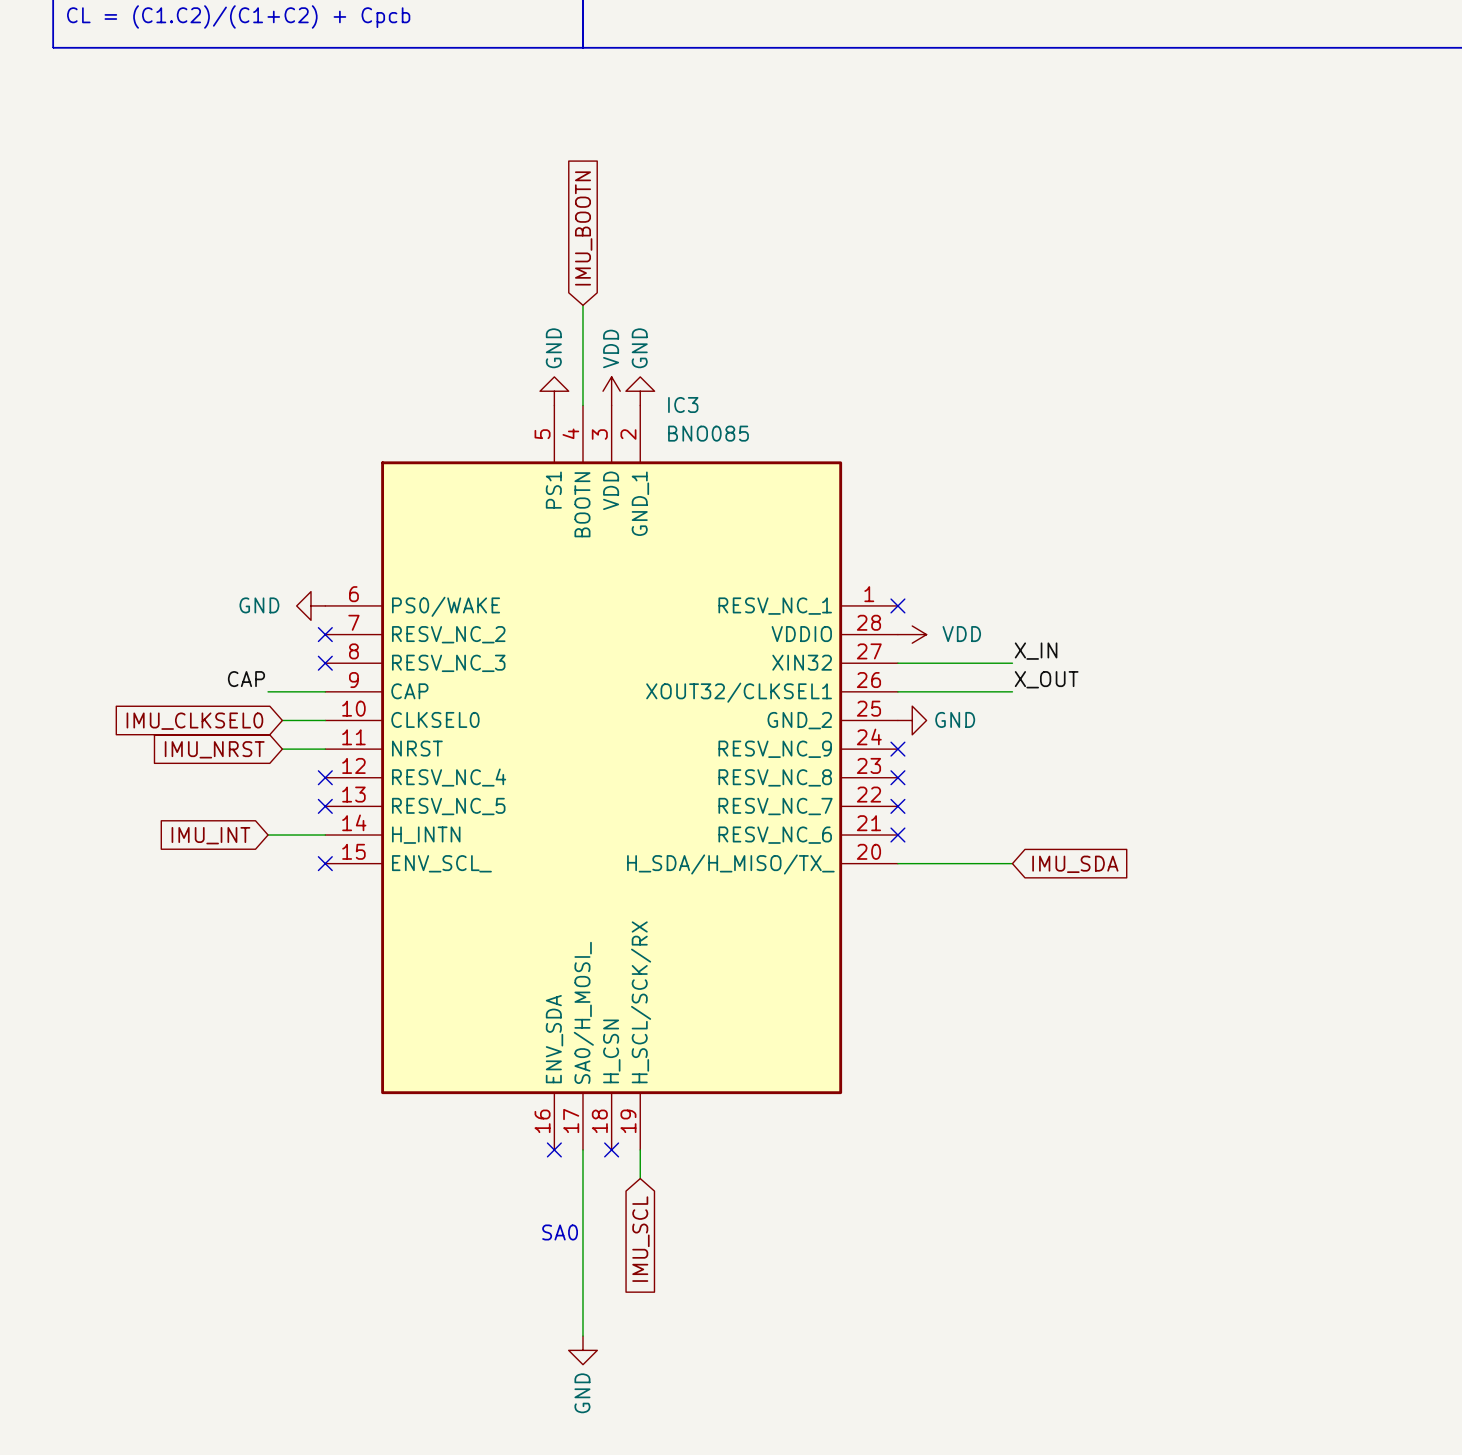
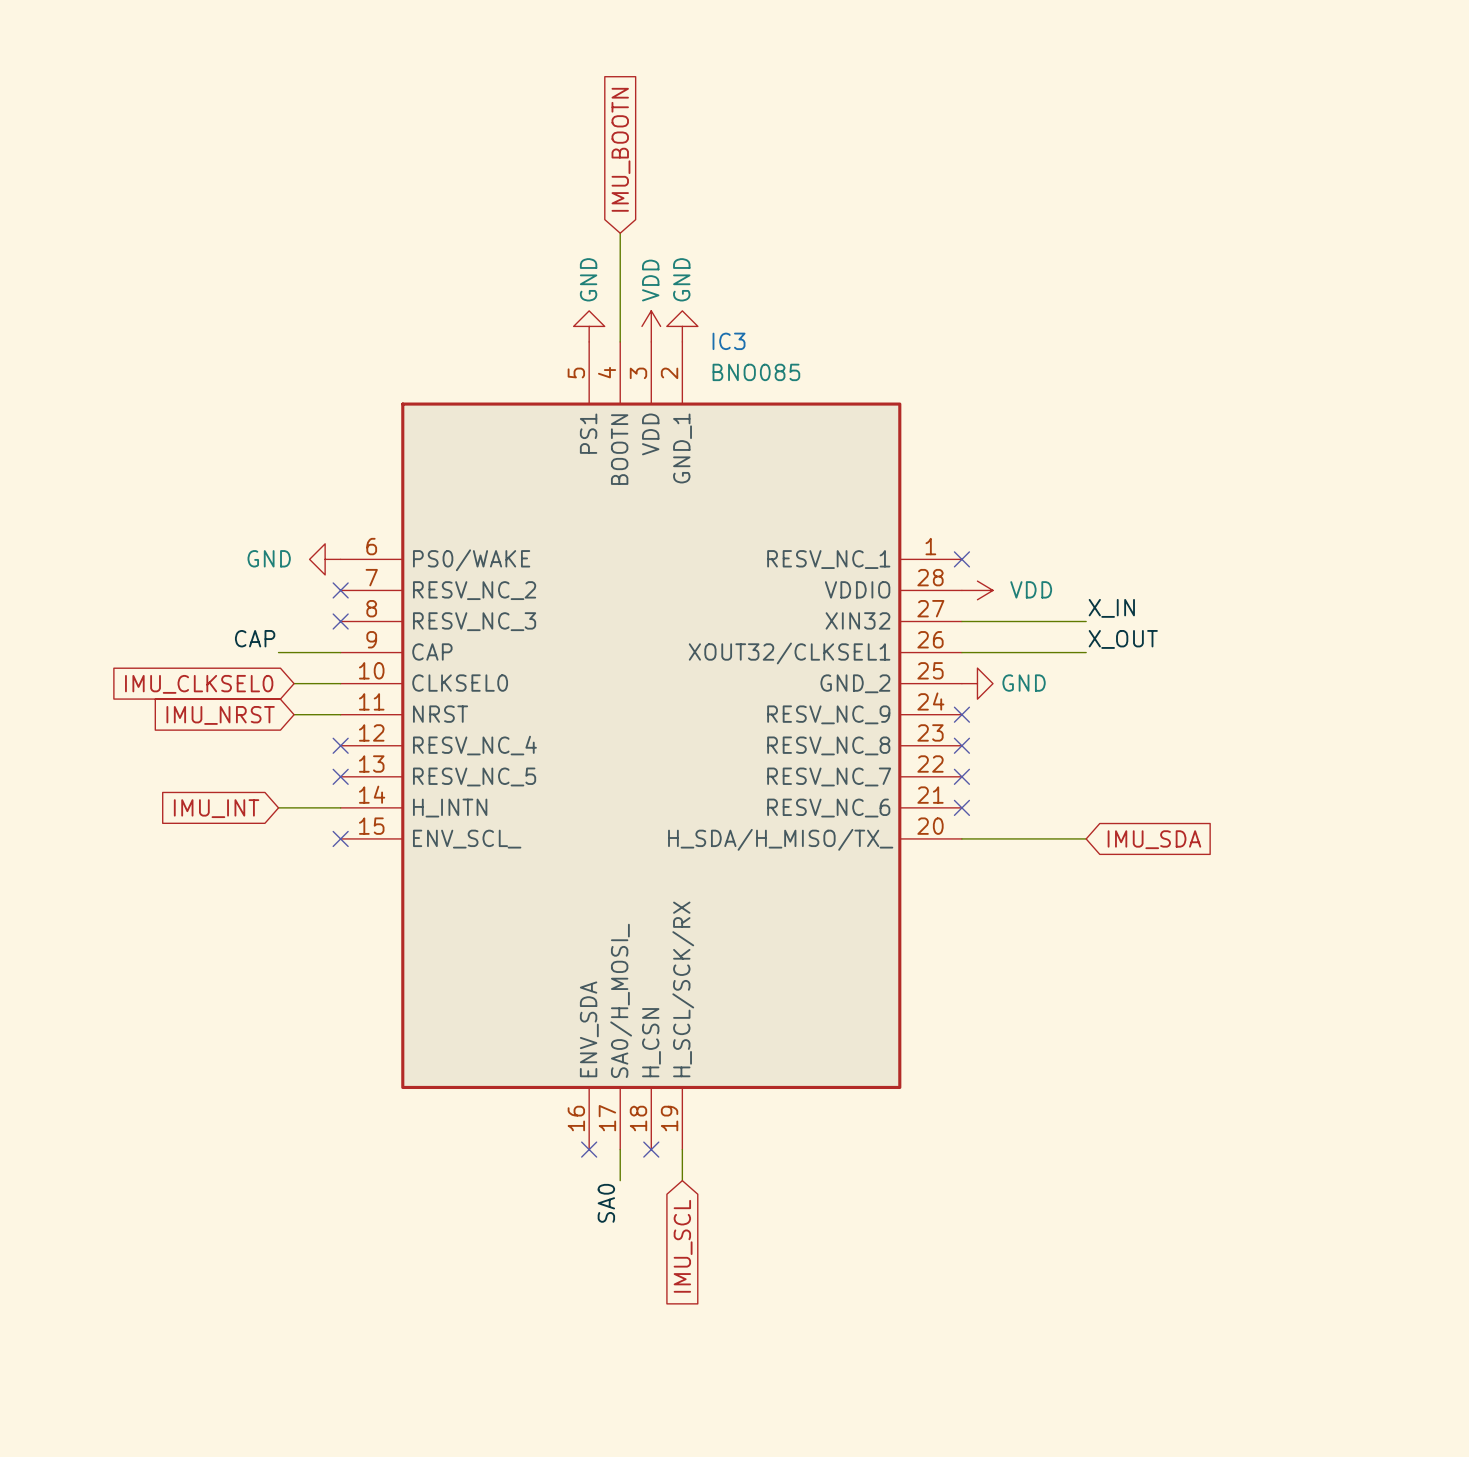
wire: (582, 1178) (582, 1336) -> none
label: none -> SA0 (606, 1203)
text: SA0 (560, 1232) -> none
power symbol: GND (582, 1350) -> none

